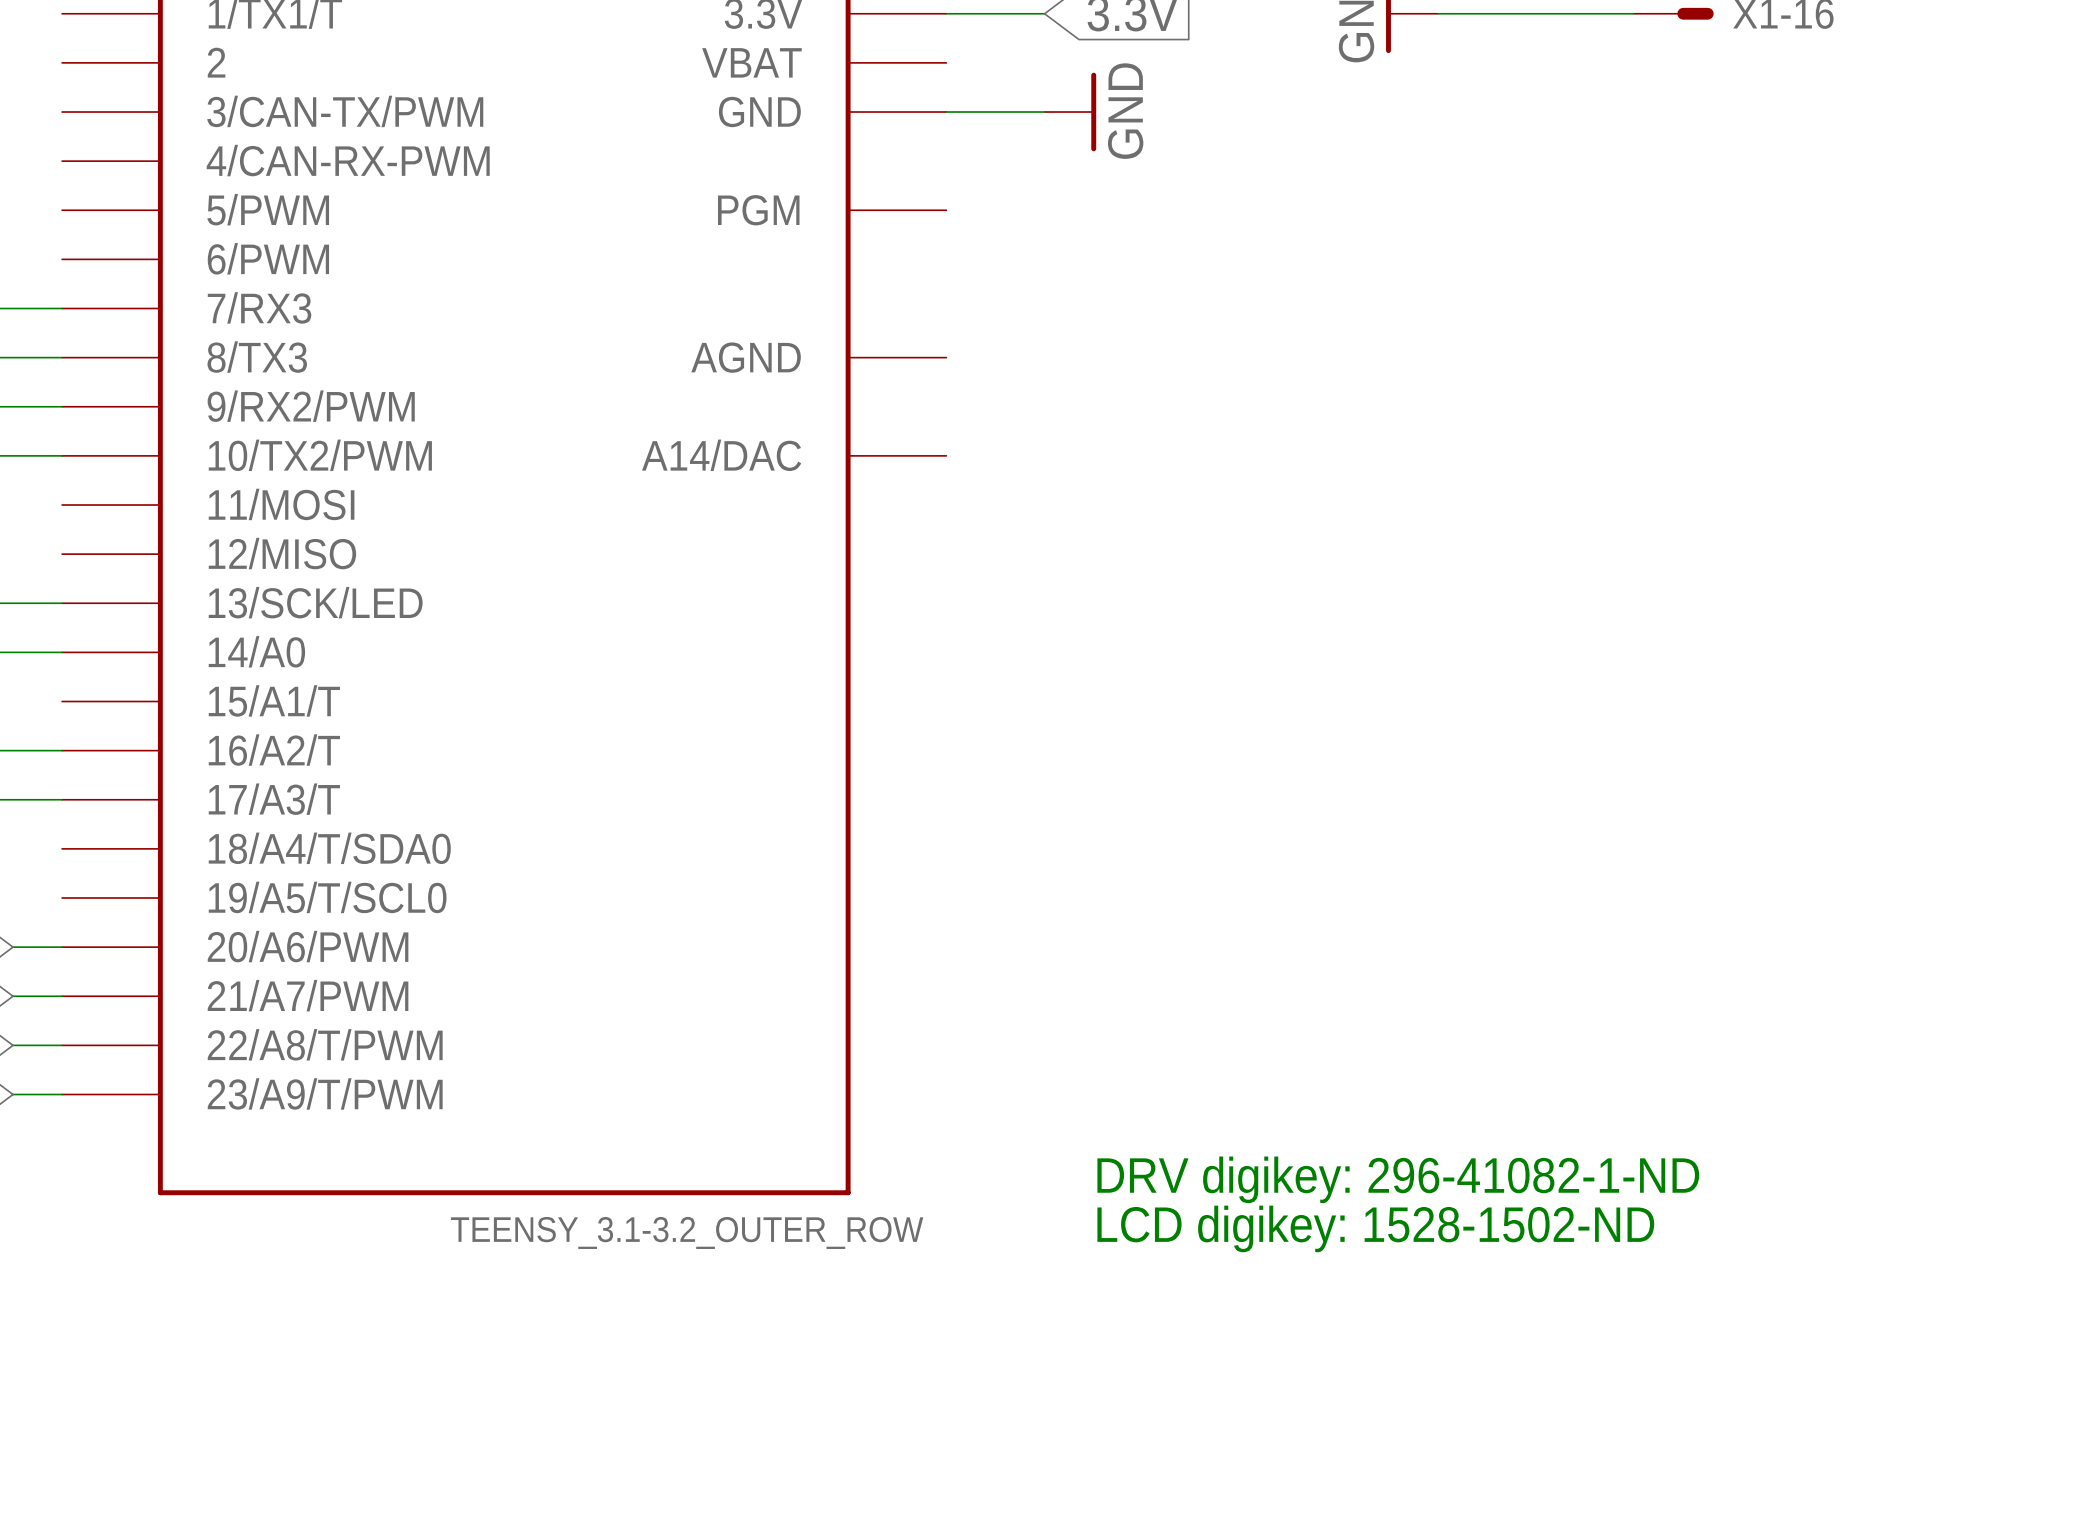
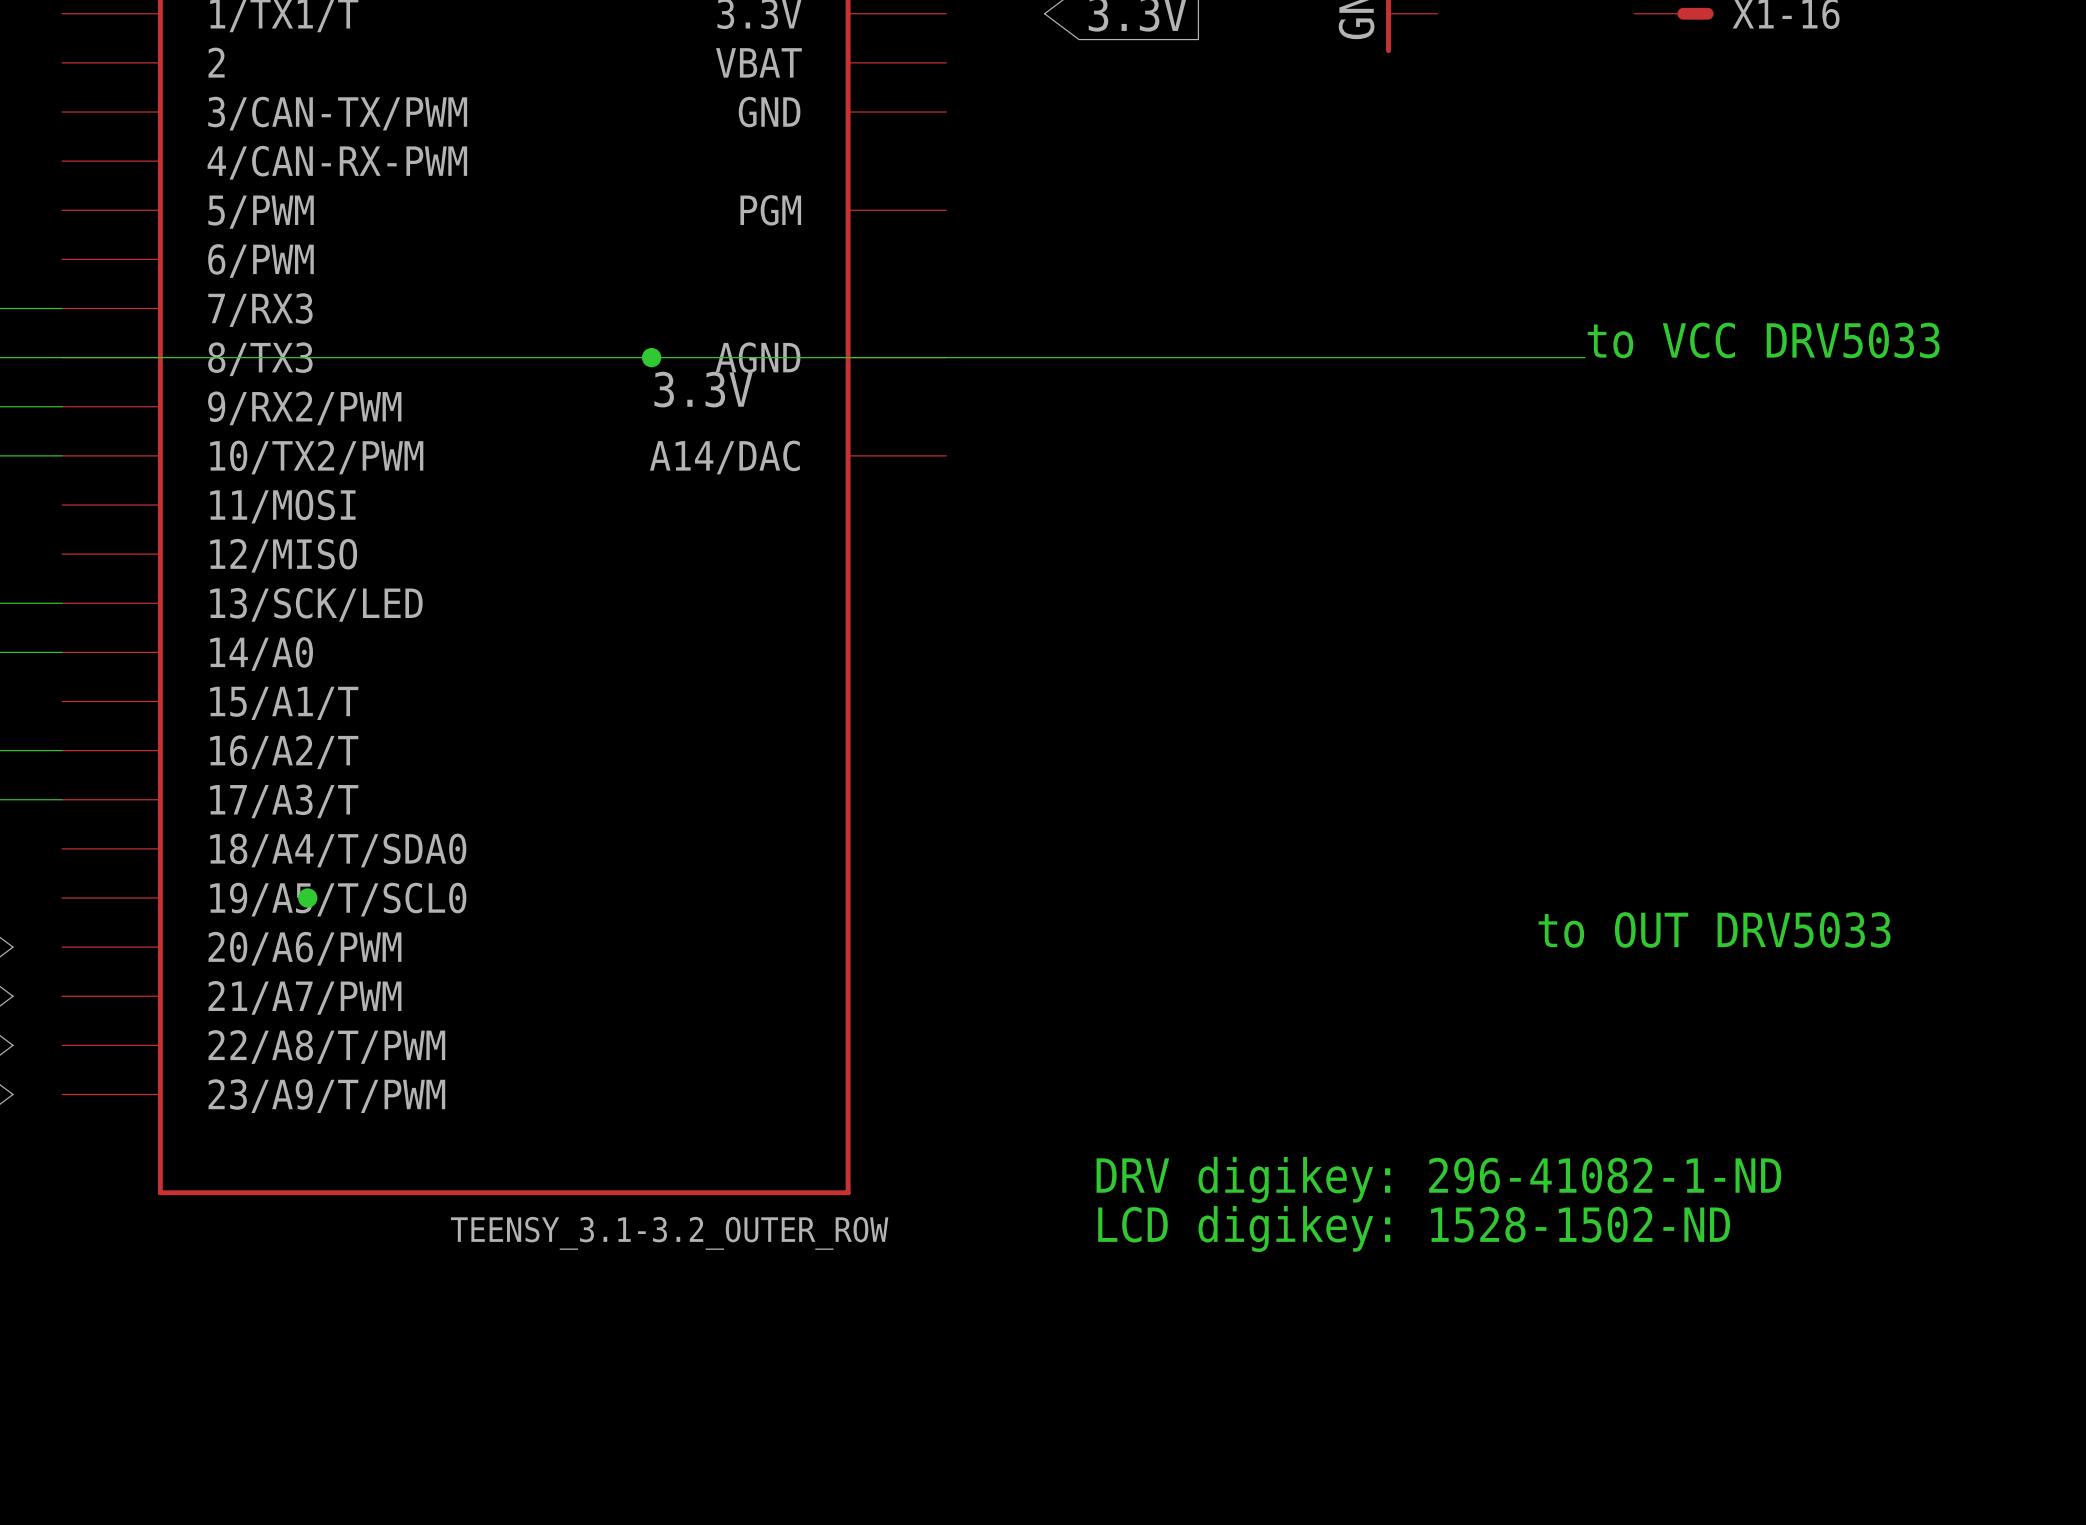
wire: (946, 13) (1044, 13) -> none
wire: (1437, 13) (1634, 13) -> none
wire: (946, 112) (1044, 112) -> none
power symbol: GND (1070, 112) -> none
text: none -> to VCC DRV5033 (1763, 340)
wire: none -> (62, 357) (1584, 357)
junction: none -> (651, 357)
label: none -> 3.3V (703, 389)
junction: none -> (307, 898)
text: none -> to OUT DRV5033 (1714, 929)
wire: (12, 947) (62, 947) -> none
wire: (12, 996) (62, 996) -> none
wire: (12, 1045) (62, 1045) -> none
wire: (12, 1094) (62, 1094) -> none

